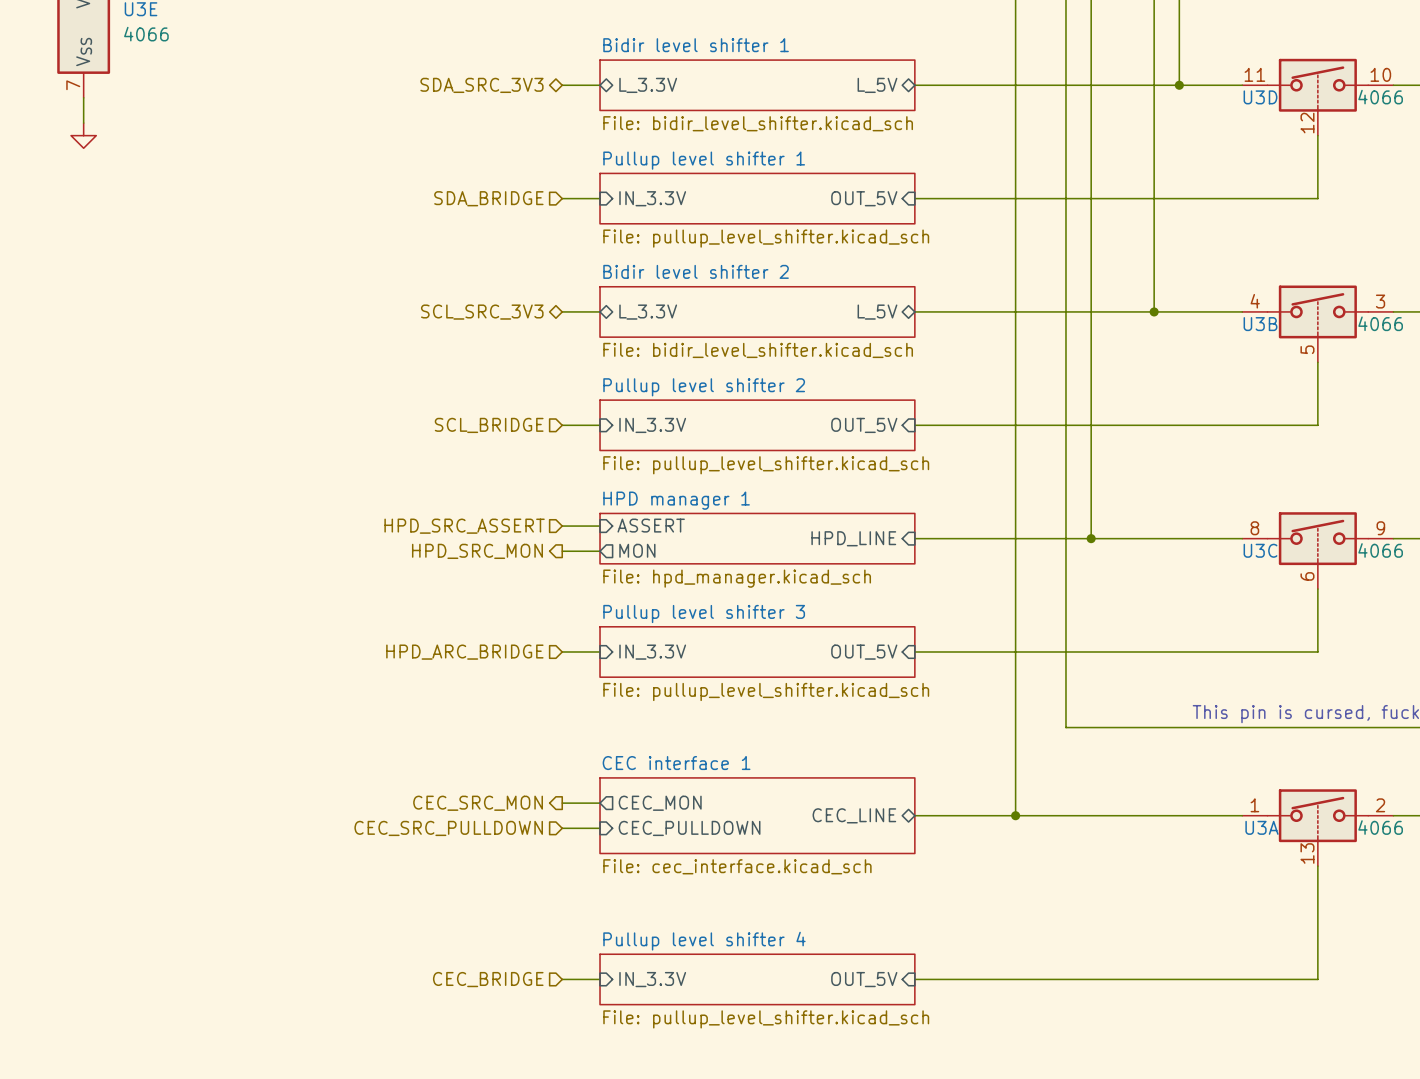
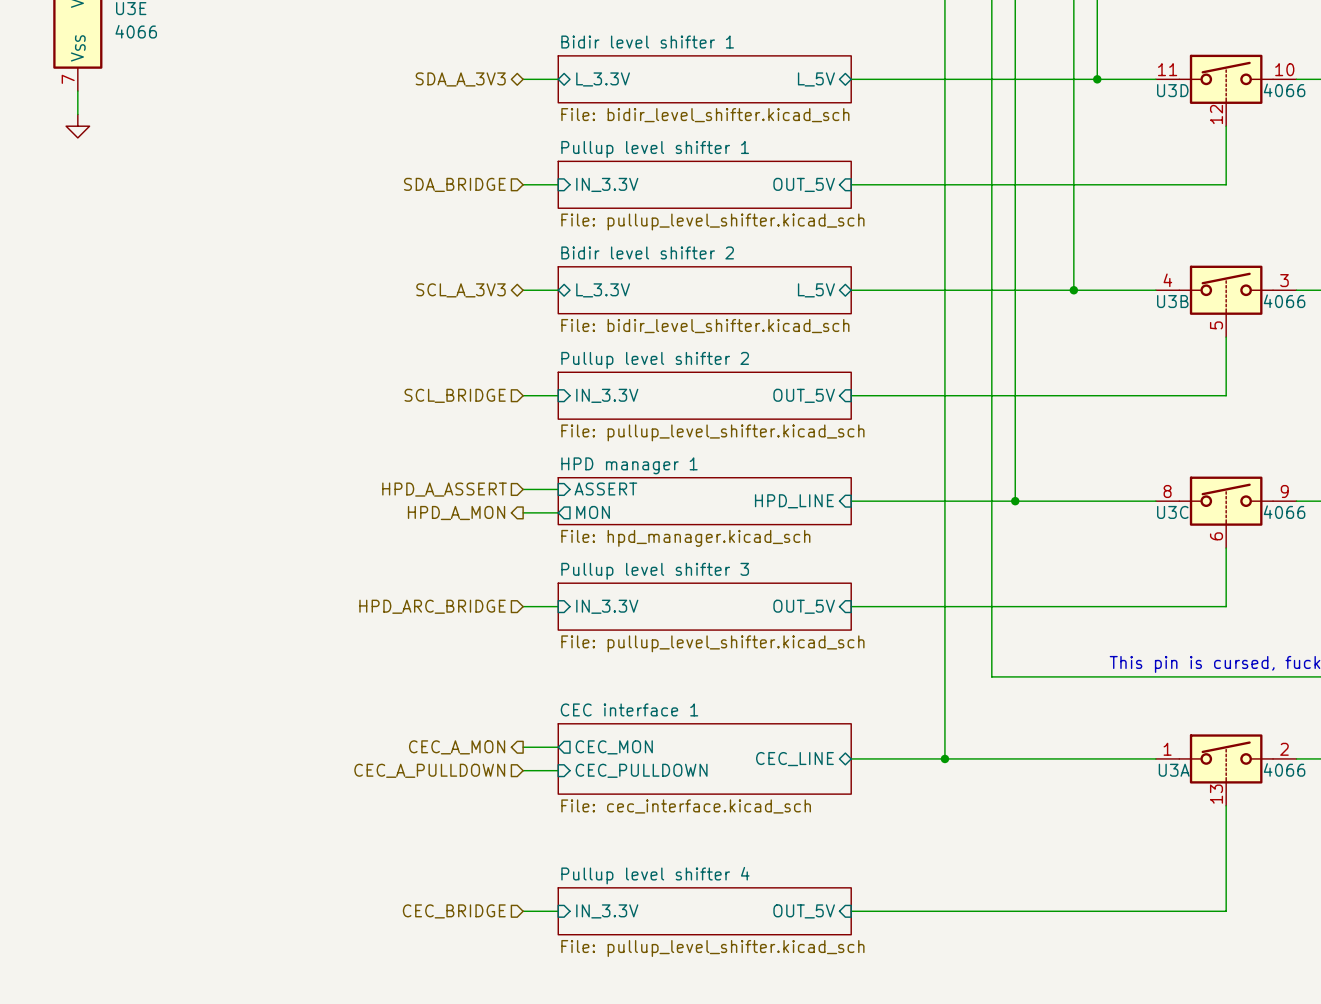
hierarchical label: SDA_SRC_3V3 (481, 85) -> SDA_A_3V3 (460, 79)
hierarchical label: SCL_SRC_3V3 (482, 312) -> SCL_A_3V3 (460, 290)
hierarchical label: HPD_SRC_ASSERT (464, 526) -> HPD_A_ASSERT (444, 489)
hierarchical label: HPD_SRC_MON (477, 551) -> HPD_A_MON (456, 513)
hierarchical label: CEC_SRC_MON (478, 803) -> CEC_A_MON (457, 747)
hierarchical label: CEC_SRC_PULLDOWN (448, 828) -> CEC_A_PULLDOWN (429, 770)

